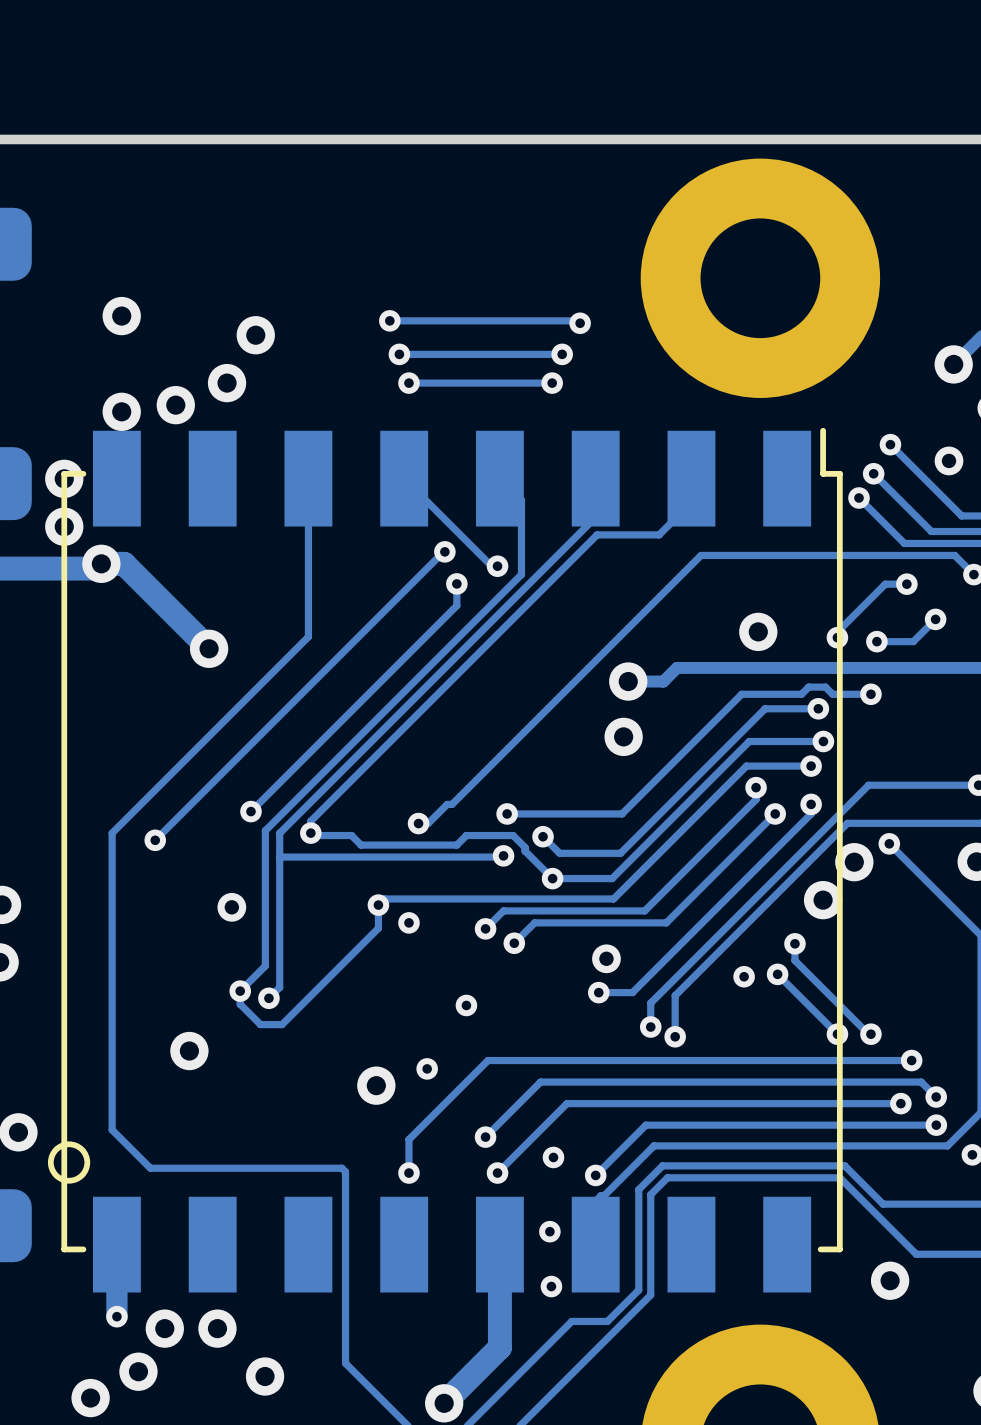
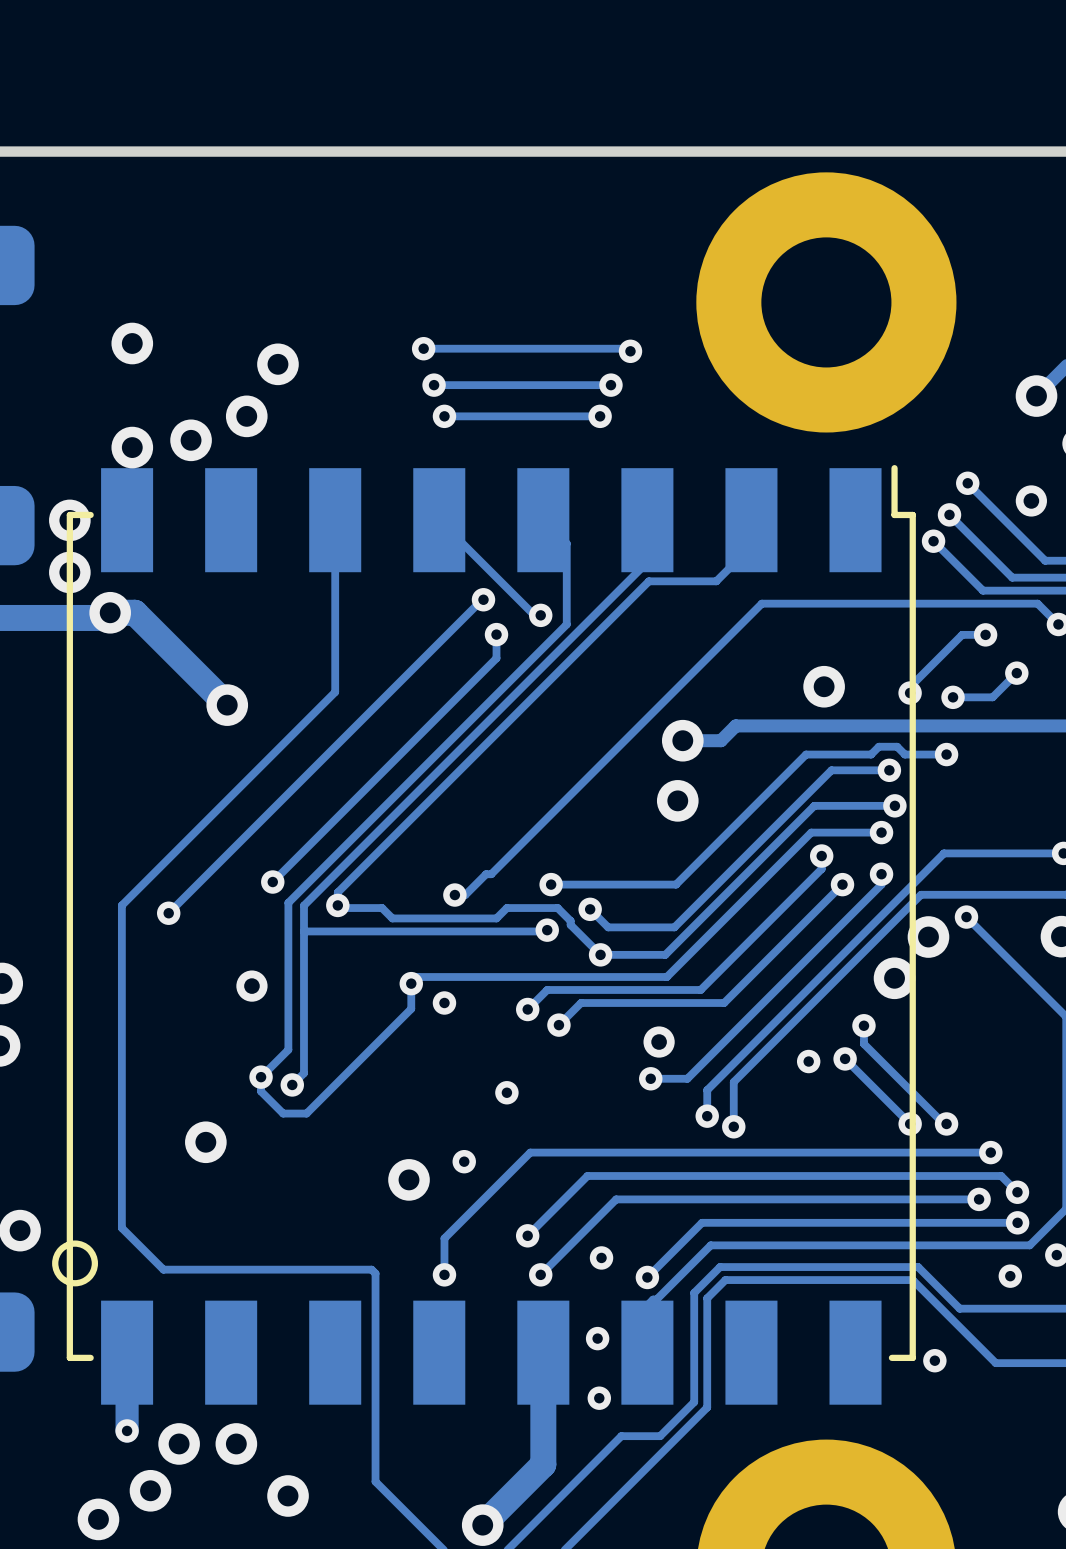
via: none -> (1010, 1276)
via position: (890, 1280) -> (934, 1360)

